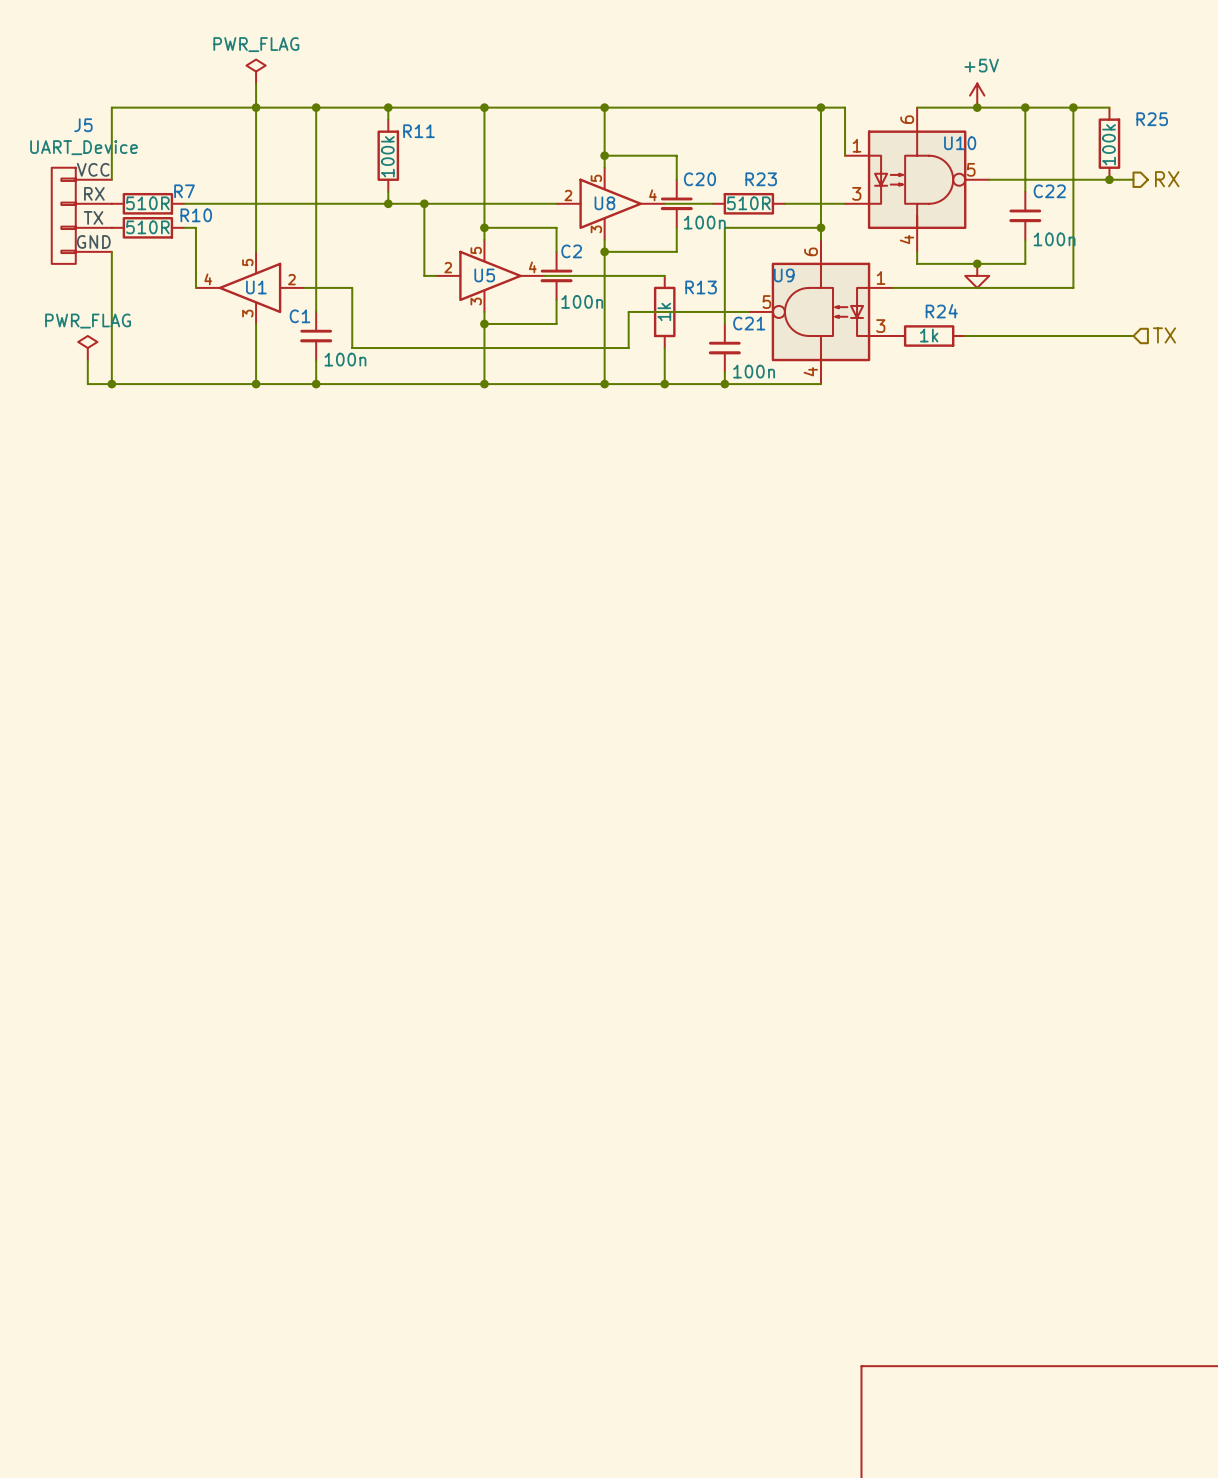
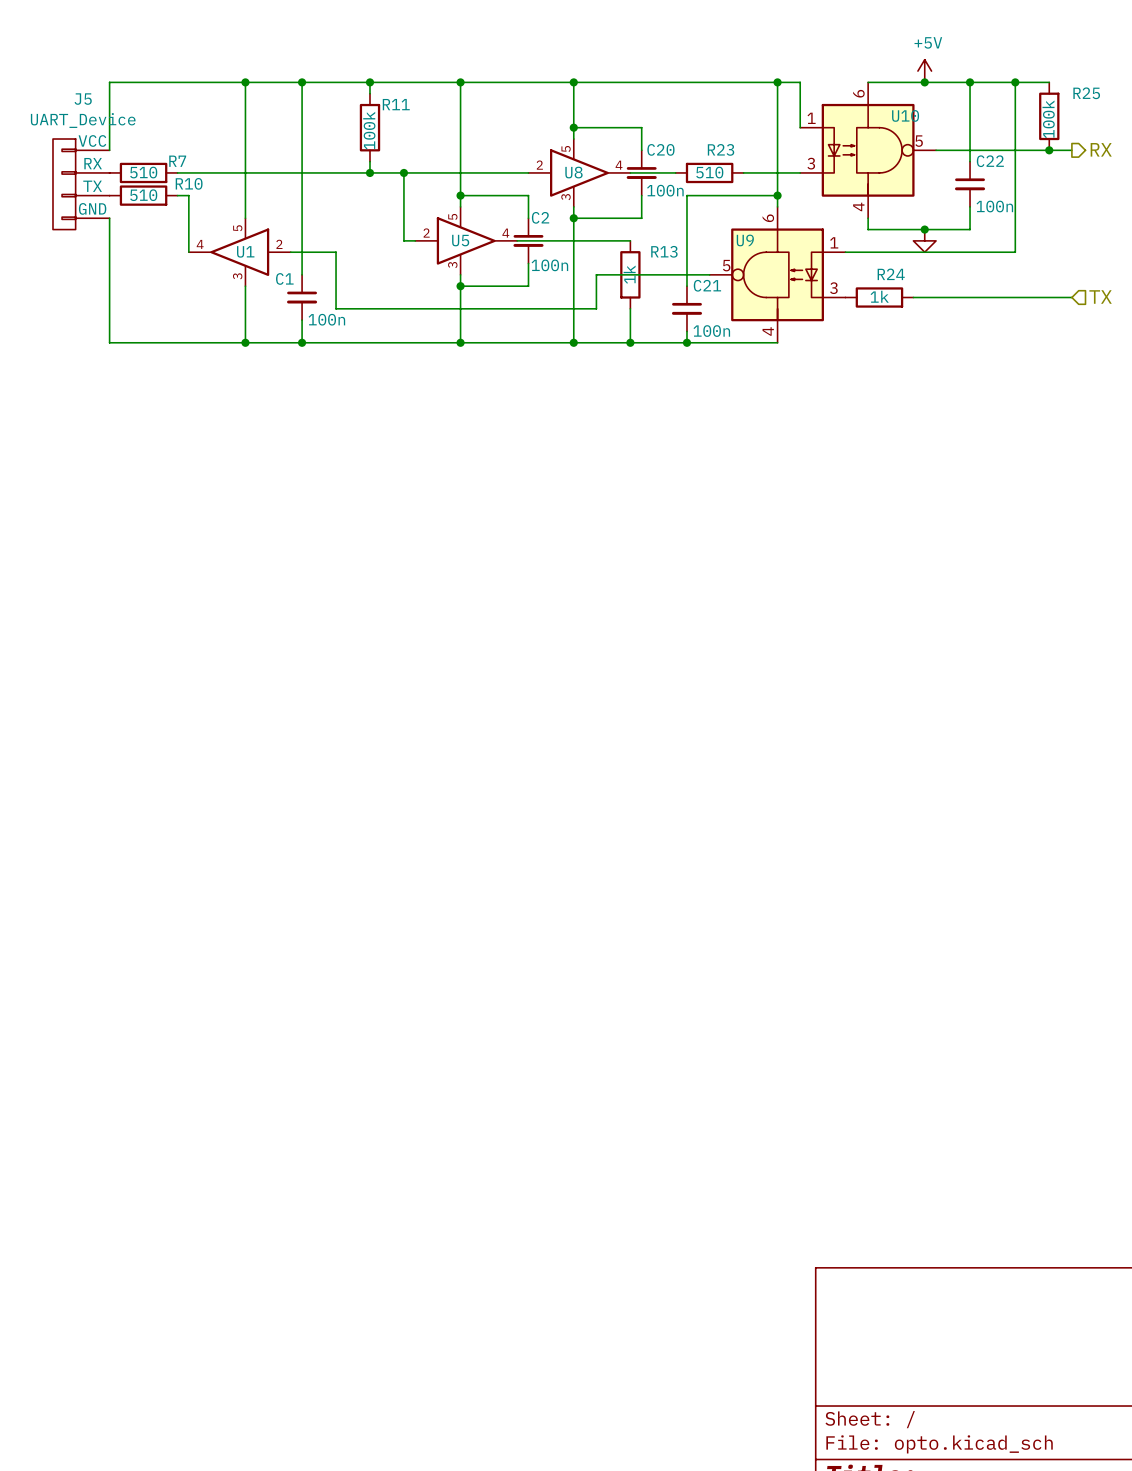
power symbol: PWR_FLAG (256, 71) -> none
wire: (256, 83) (256, 107) -> none
R7 value: 510R (147, 203) -> 510 (143, 172)
R23 value: 510R (748, 203) -> 510 (709, 172)
R10 value: 510R (147, 227) -> 510 (143, 195)
power symbol: PWR_FLAG (87, 348) -> none
wire: (87, 360) (87, 384) (111, 384) -> none
junction: (111, 384) -> none

